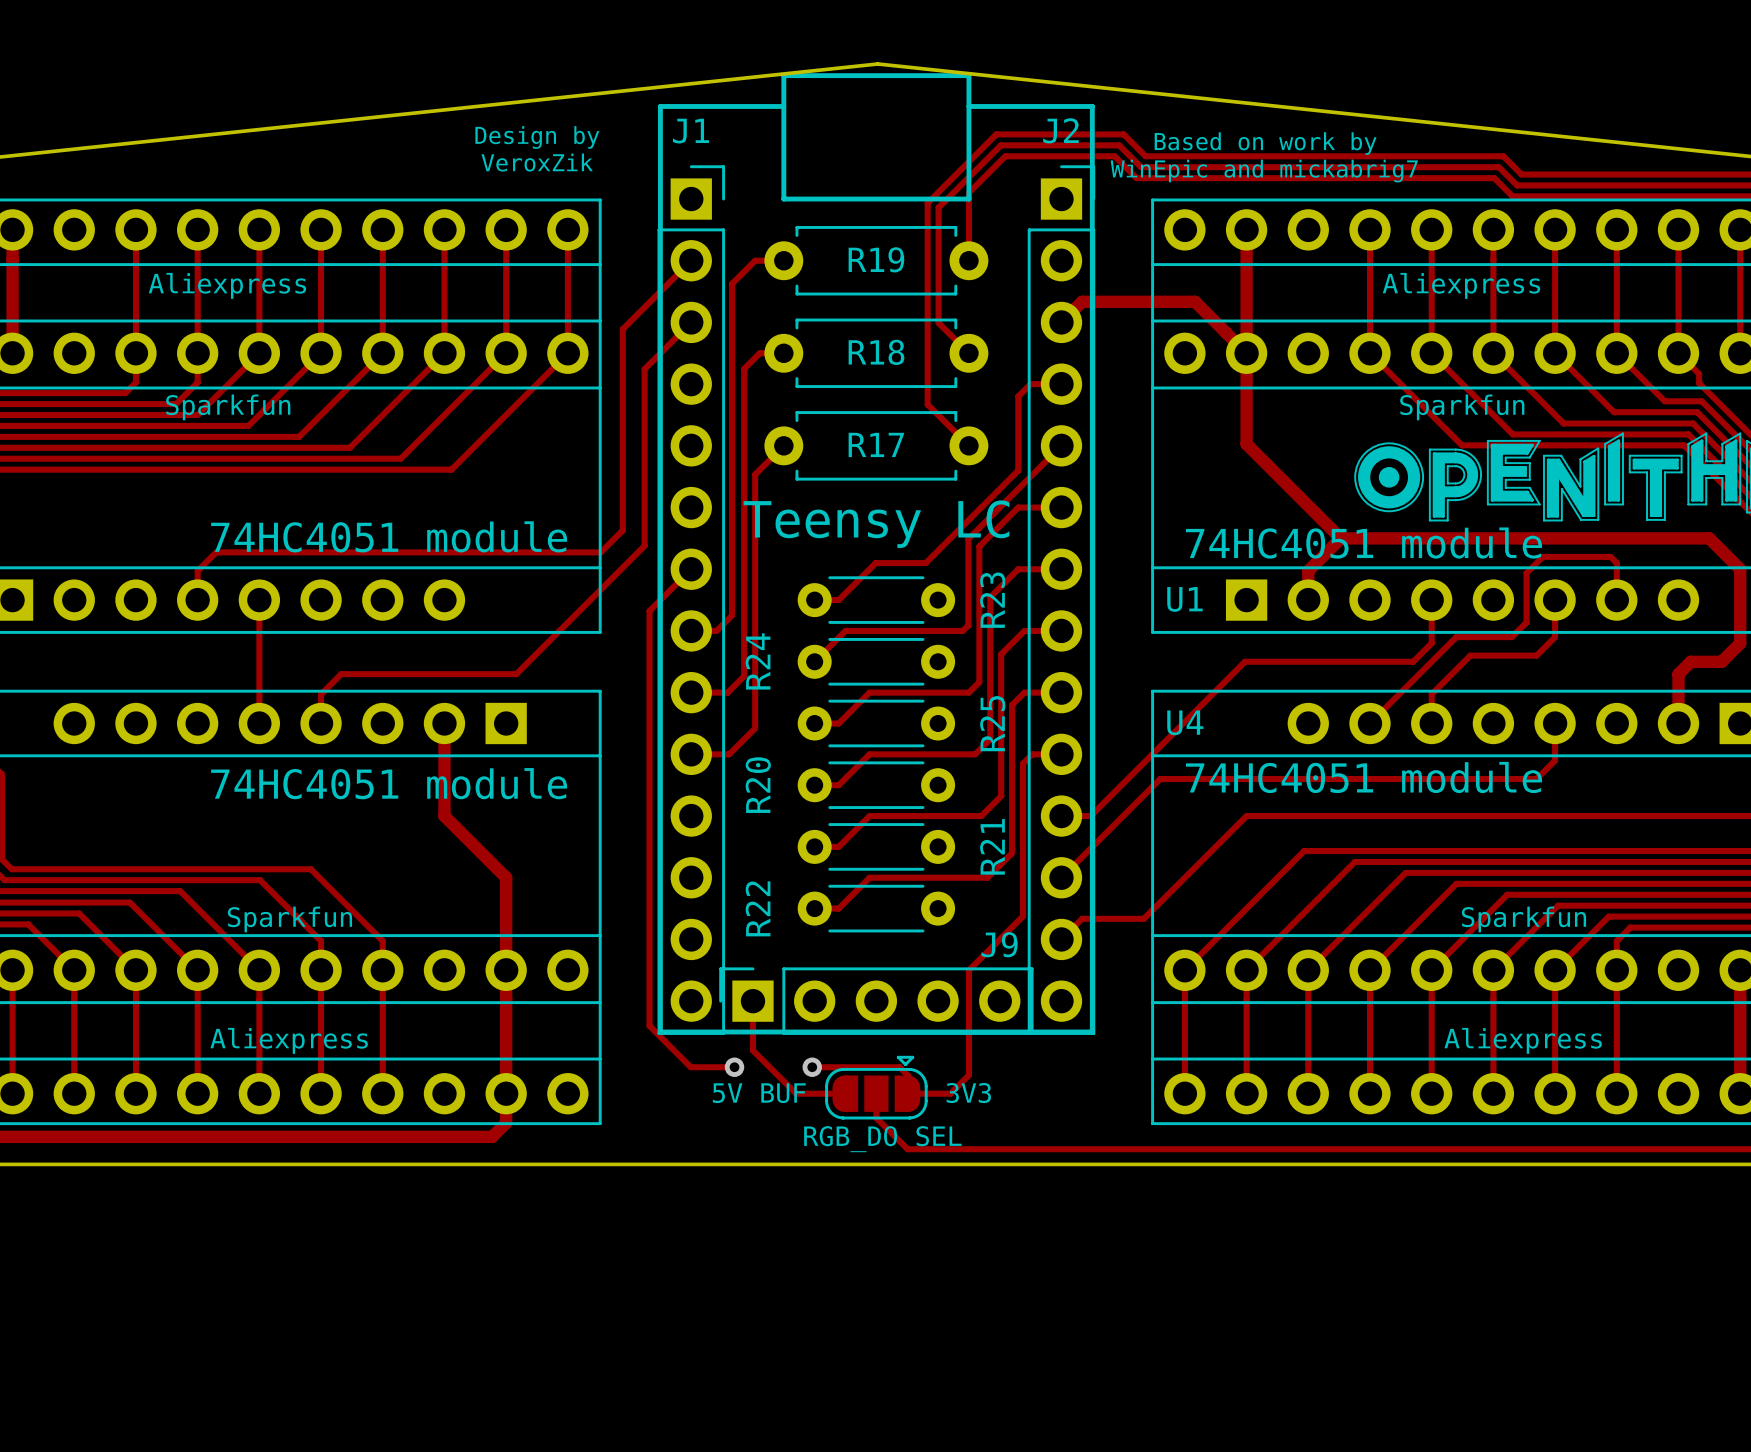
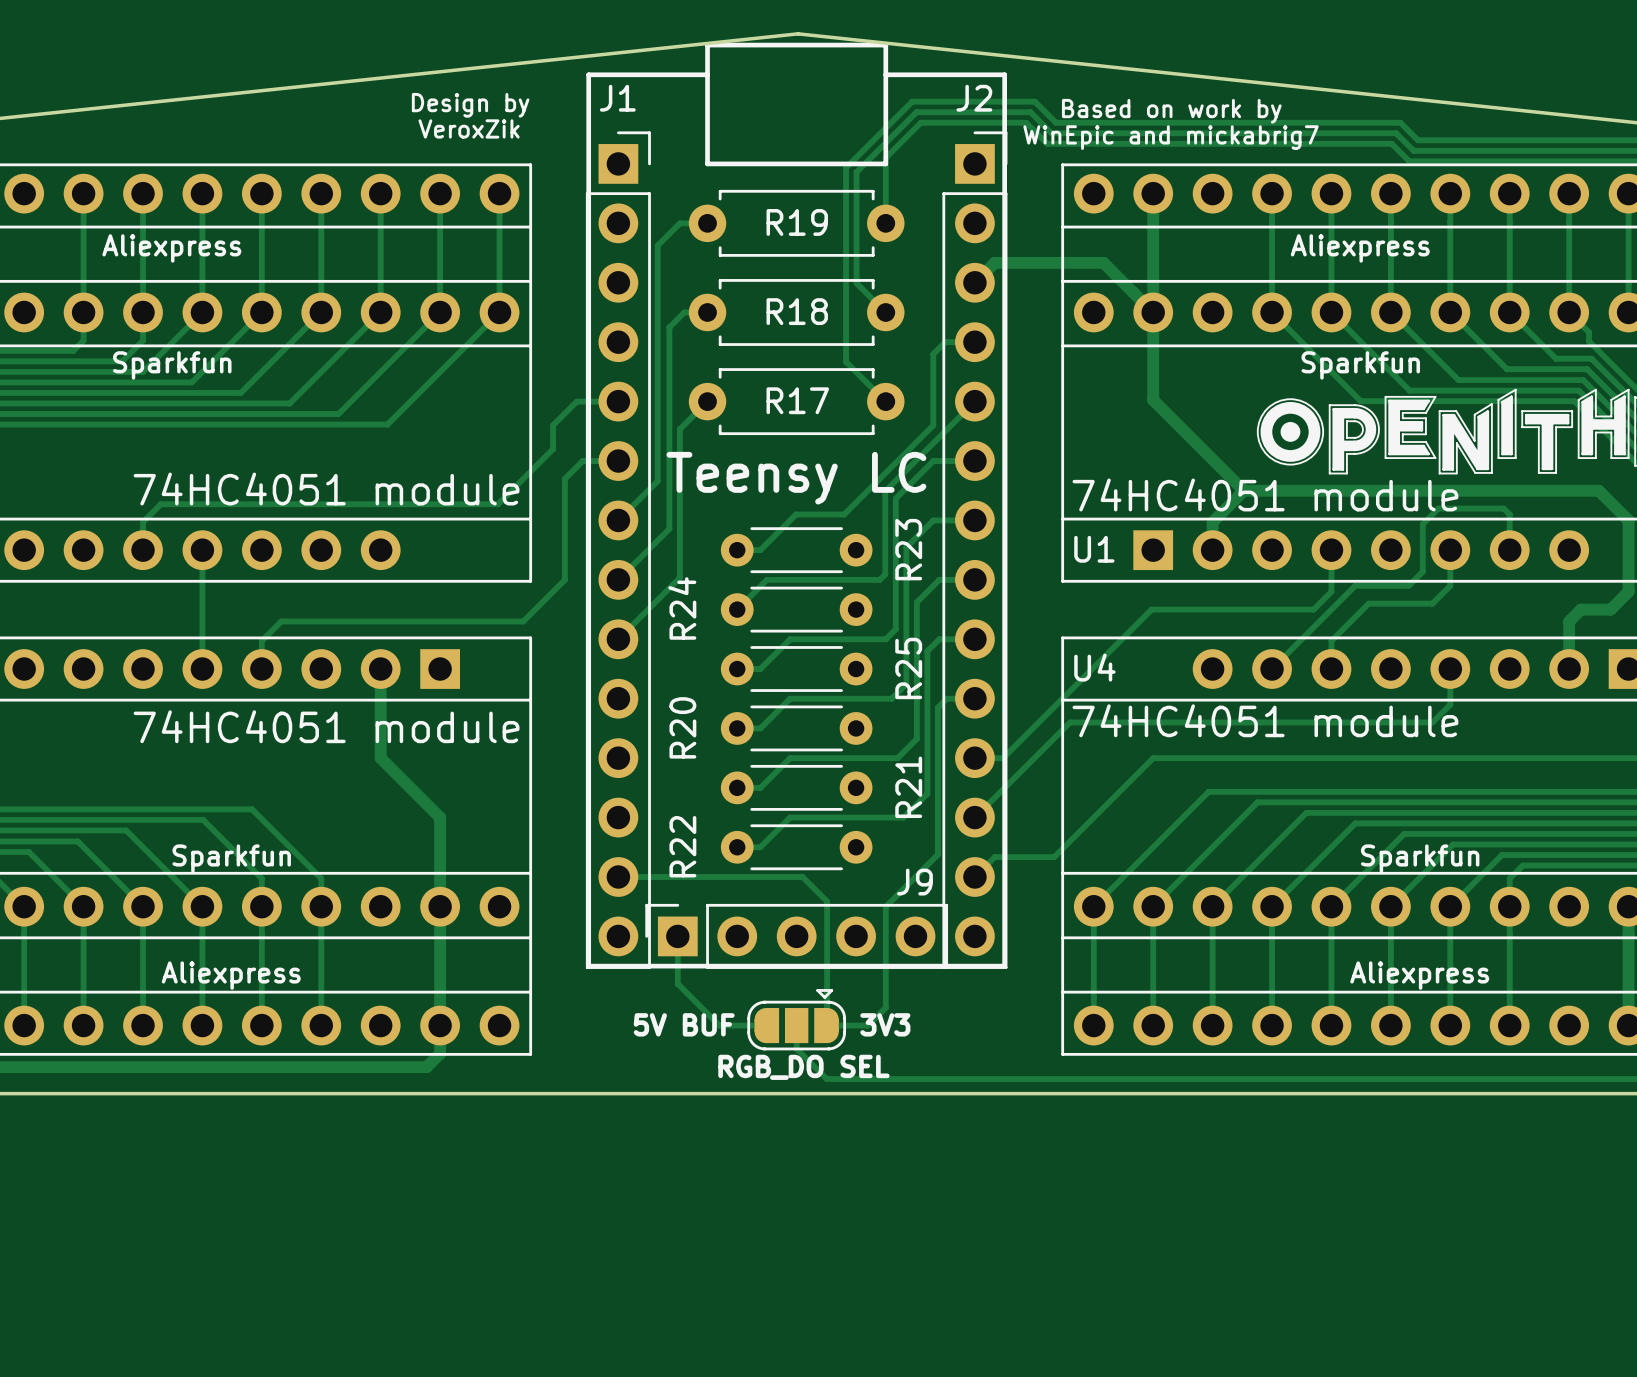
track: (691, 260) (622, 329) (622, 530) (600, 552) (566, 552) -> (618, 401) (576, 401) (553, 425) (553, 449) (497, 504)
track: (691, 322) (644, 369) (644, 545) (516, 674) -> (618, 461) (582, 461) (564, 478) (564, 579) (523, 621) (449, 621)
track: (732, 528) (732, 615) (716, 630) (691, 630) -> (669, 528) (618, 579)
track: (691, 569) (649, 611) (649, 1025) (690, 1067) (734, 1067) -> (618, 520) (657, 481)
track: (744, 577) (744, 676) (727, 692) (691, 692) -> (679, 577) (618, 639)
track: (755, 628) (755, 728) (729, 754) (691, 754) -> none
via: (734, 1067) -> none
track: (812, 1067) (899, 1067) (907, 1075) -> (618, 876) (802, 876) (827, 901) (827, 1008)
via: (812, 1067) -> none

